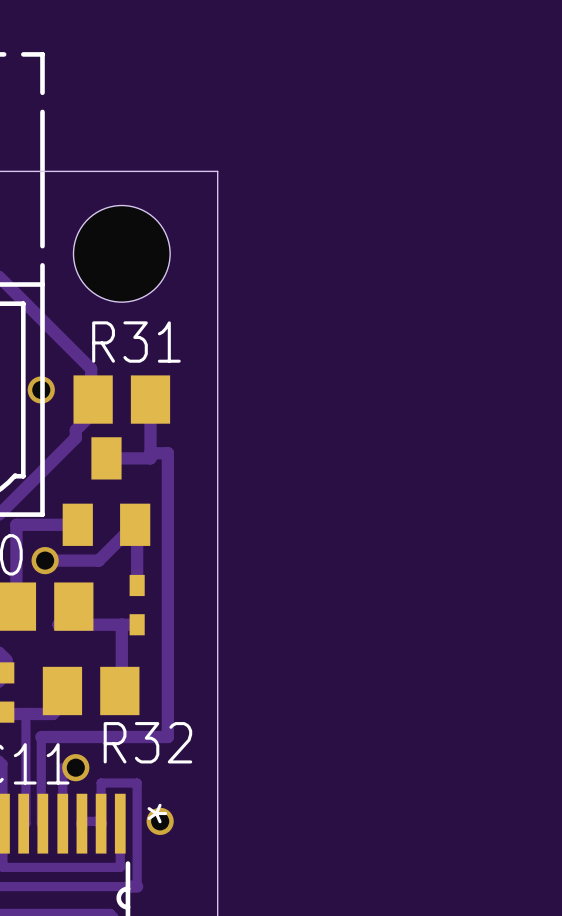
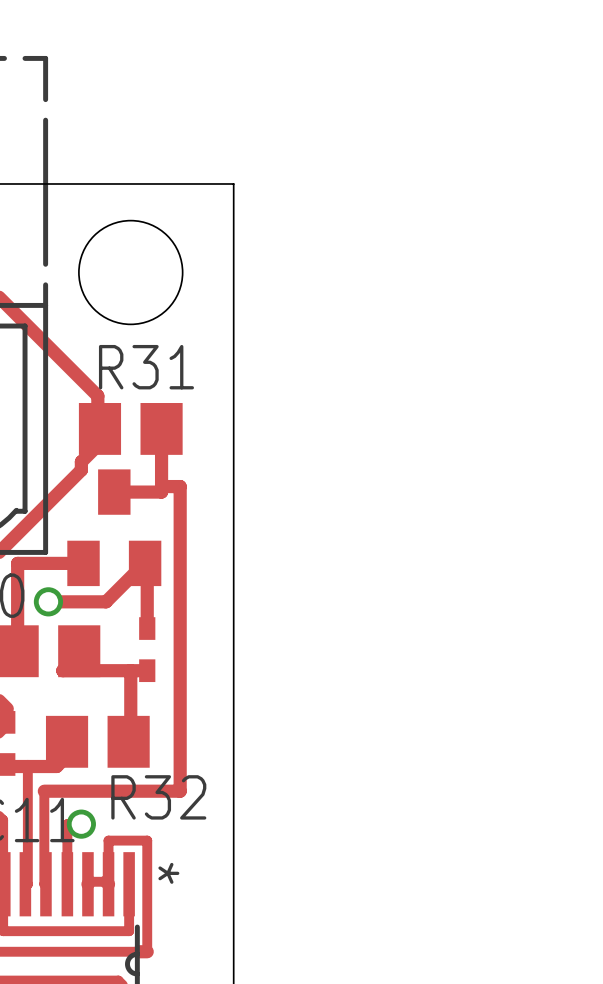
via: (41, 389) -> none
via: (160, 821) -> none

